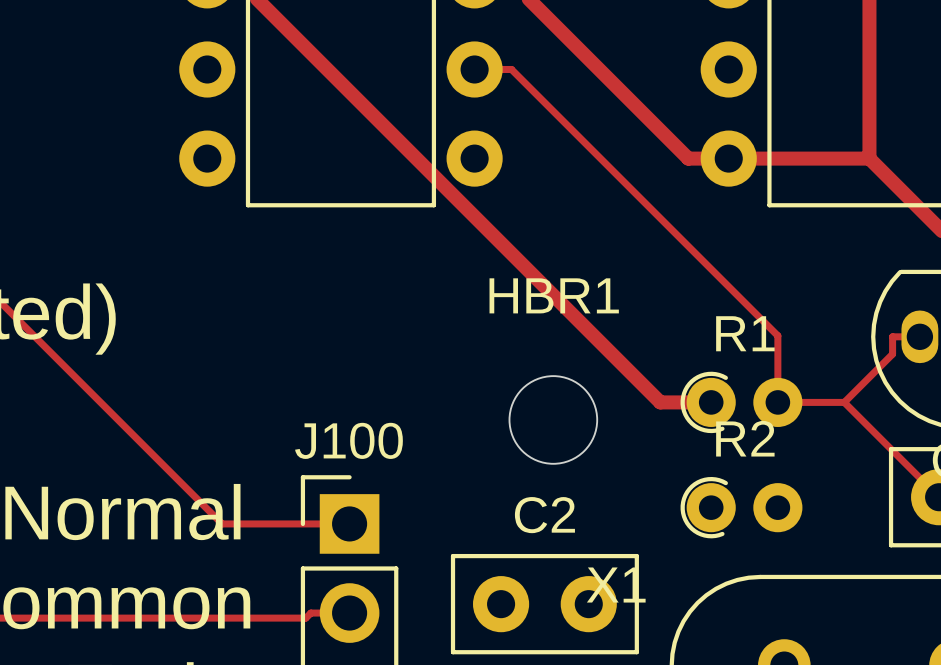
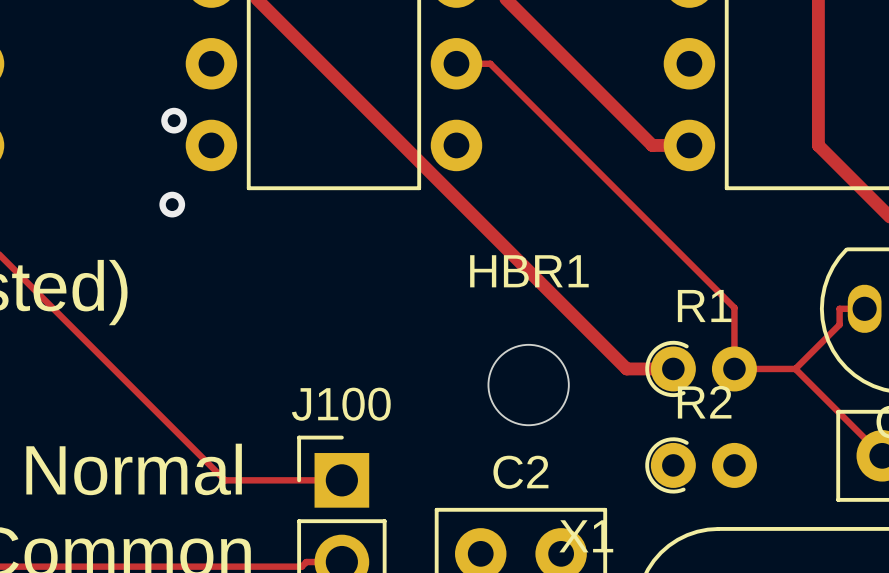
via: none -> (174, 120)
track: (728, 158) (869, 158) -> none
via: none -> (172, 204)

